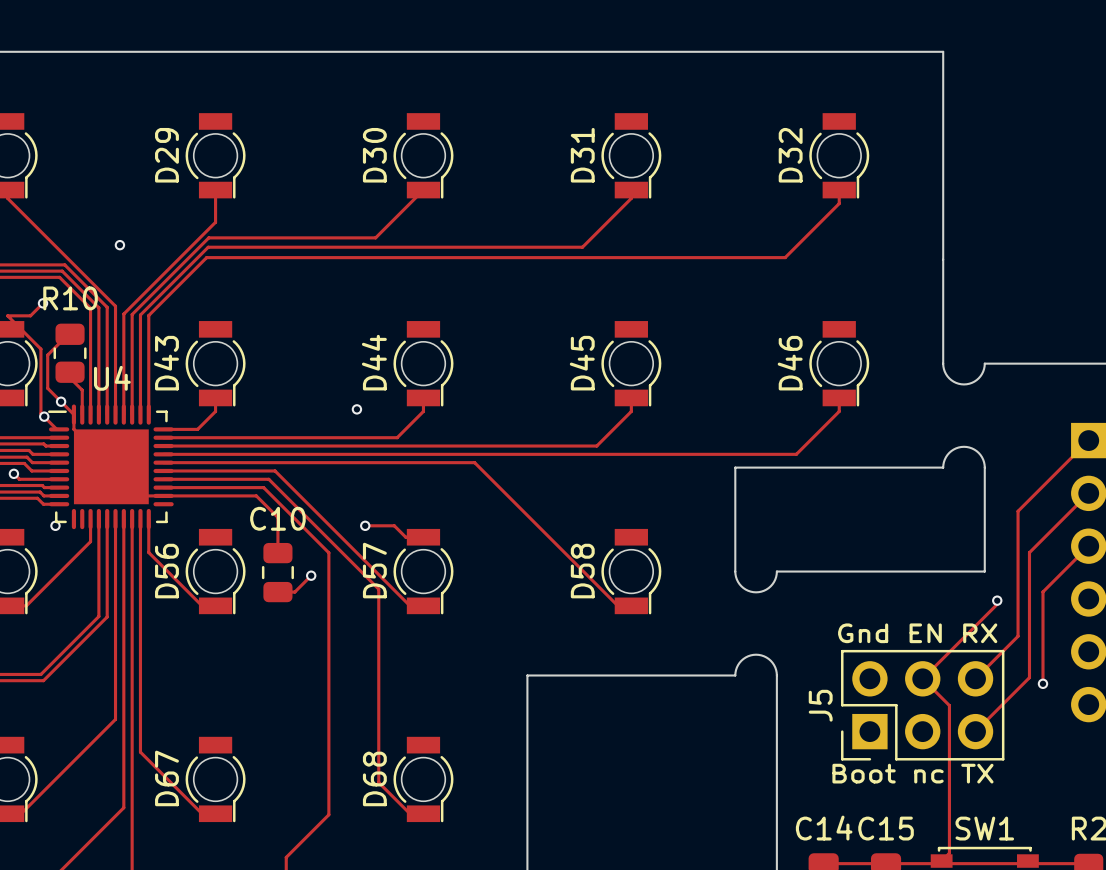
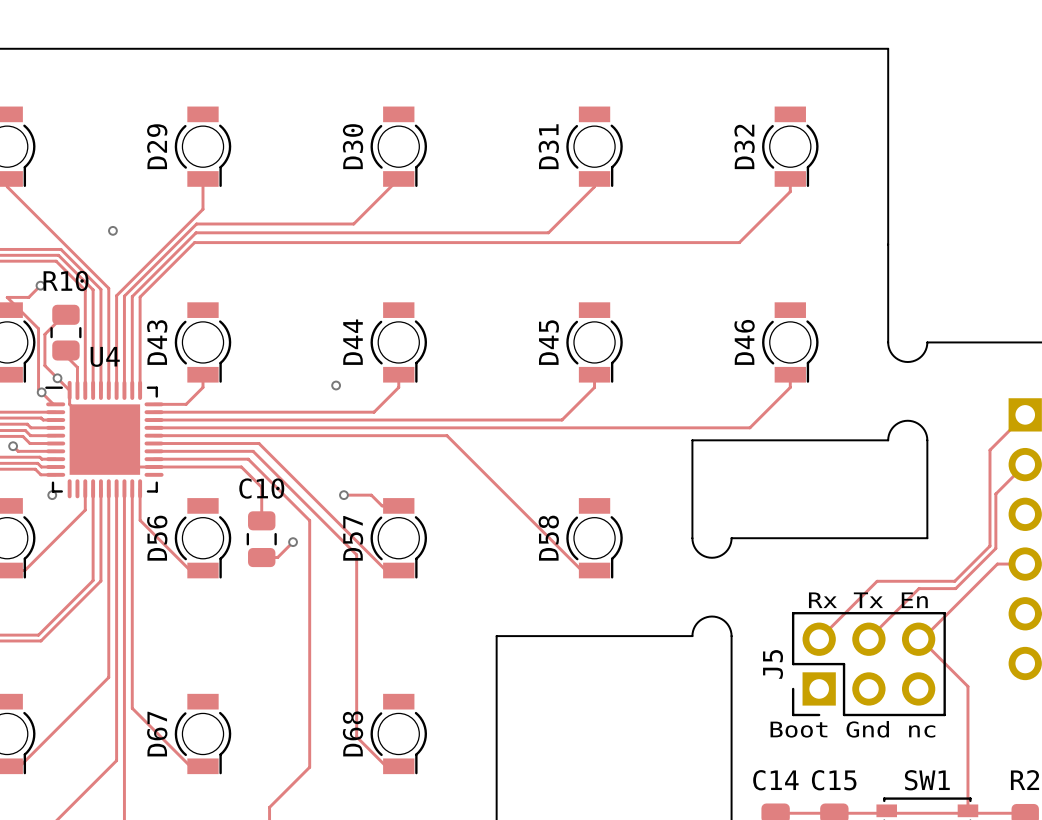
track: (1051, 477) (1018, 511) (1018, 636) (975, 678) -> (989, 450) (989, 546) (954, 581) (877, 581) (819, 639)
track: (1057, 524) (1029, 552) (1029, 677) (975, 731) -> (995, 493) (995, 548) (955, 588) (919, 588) (868, 639)
track: (1088, 546) (1042, 591) (1042, 683) -> none
track: none -> (1025, 564) (997, 564) (922, 639) (918, 639)
track: (997, 600) (997, 604) (922, 678) (949, 705) (949, 853) (941, 861) -> none
via: (997, 600) -> none
text: Gnd EN RX (917, 633) -> Rx Tx En (868, 600)
track: none -> (920, 639) (967, 686) (967, 810)
via: (1042, 683) -> none
text: Boot nc TX (912, 773) -> Boot Gnd nc (852, 729)

